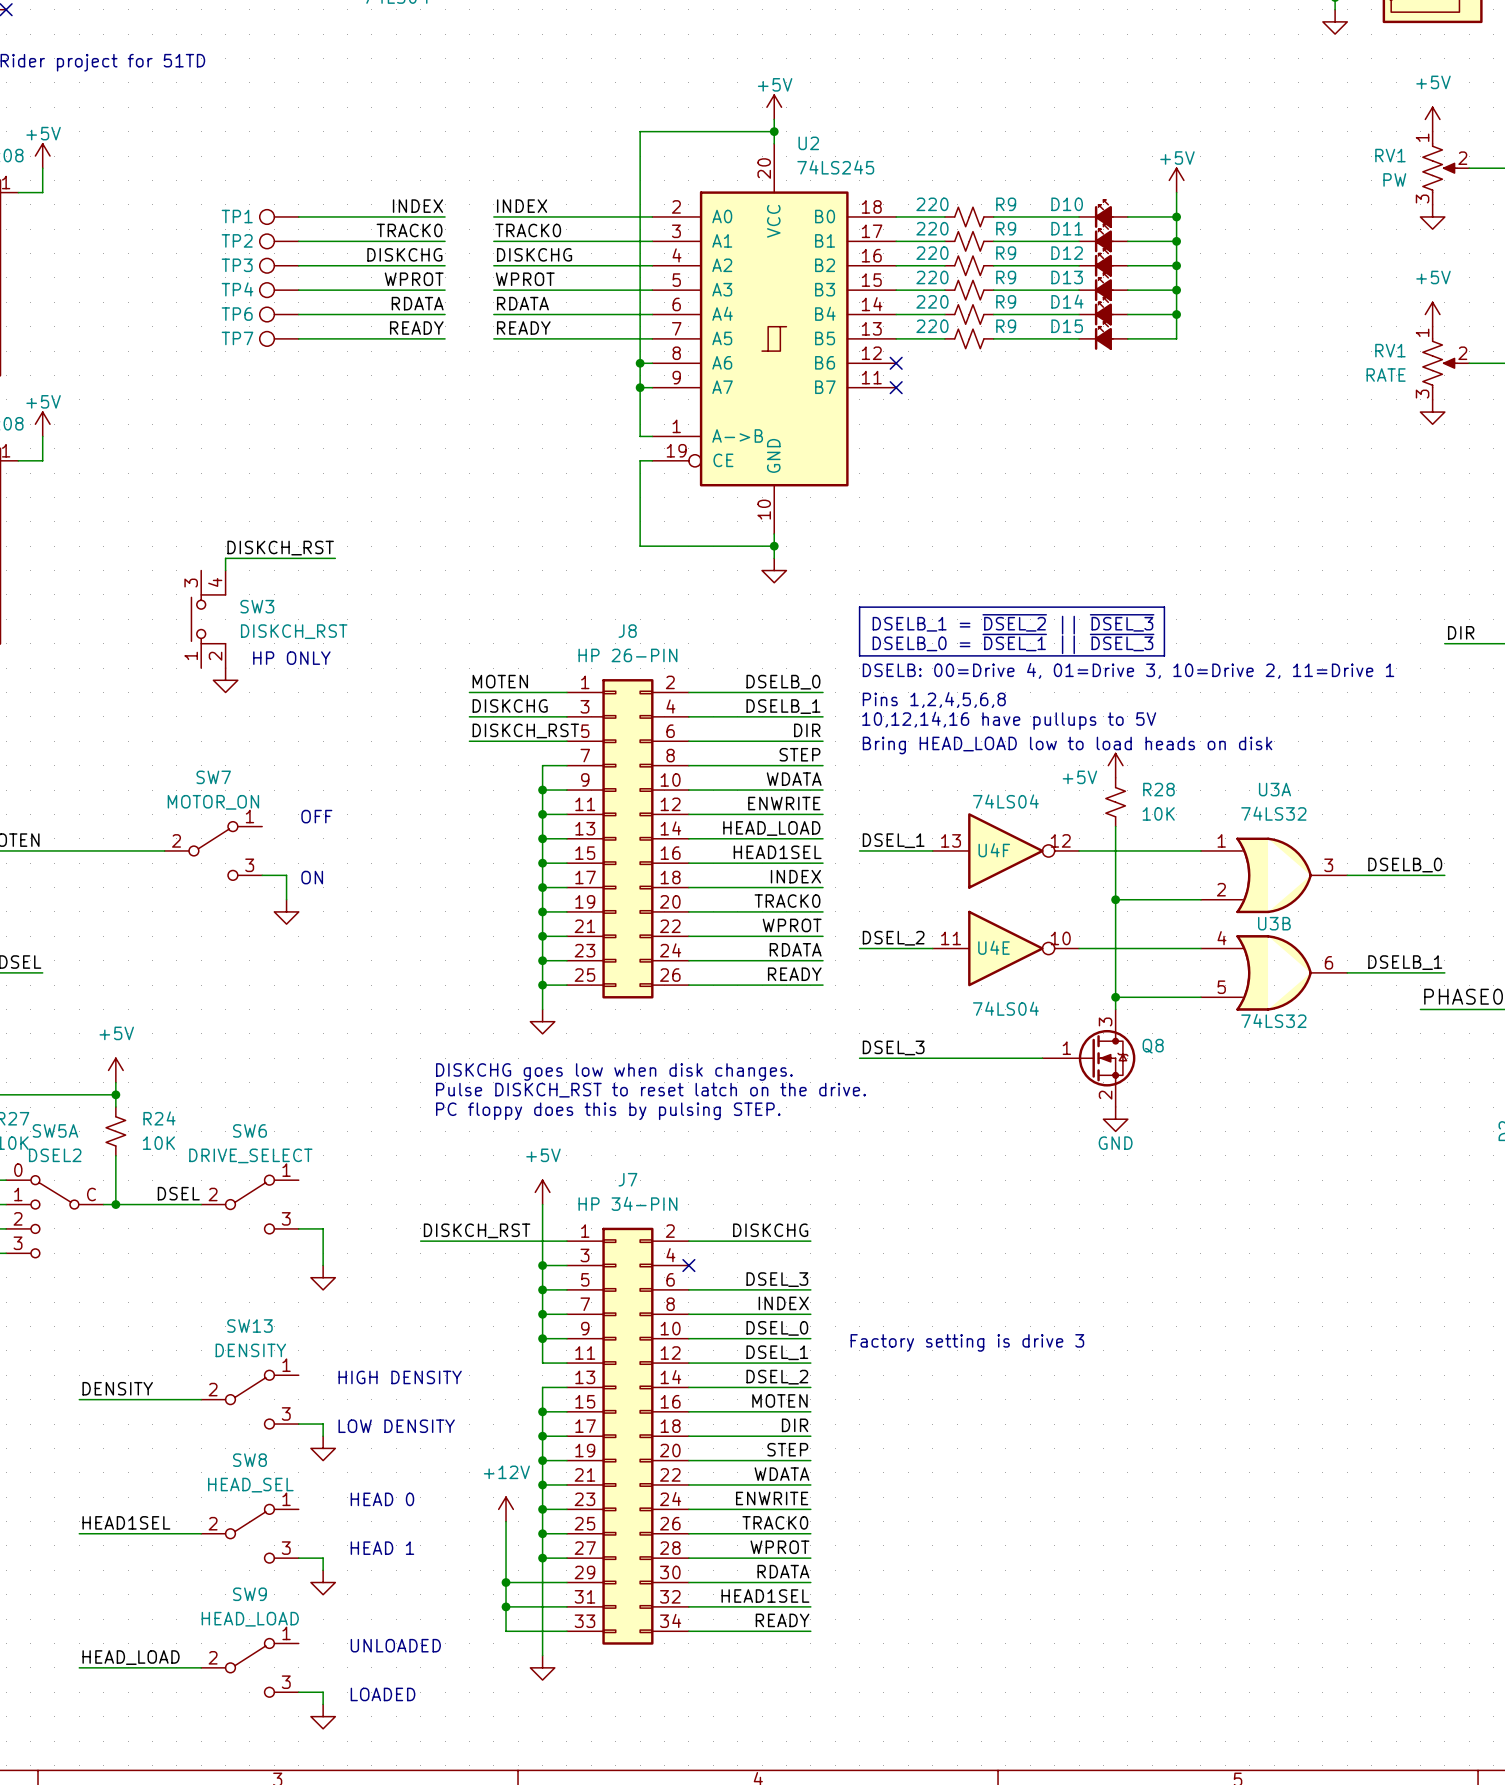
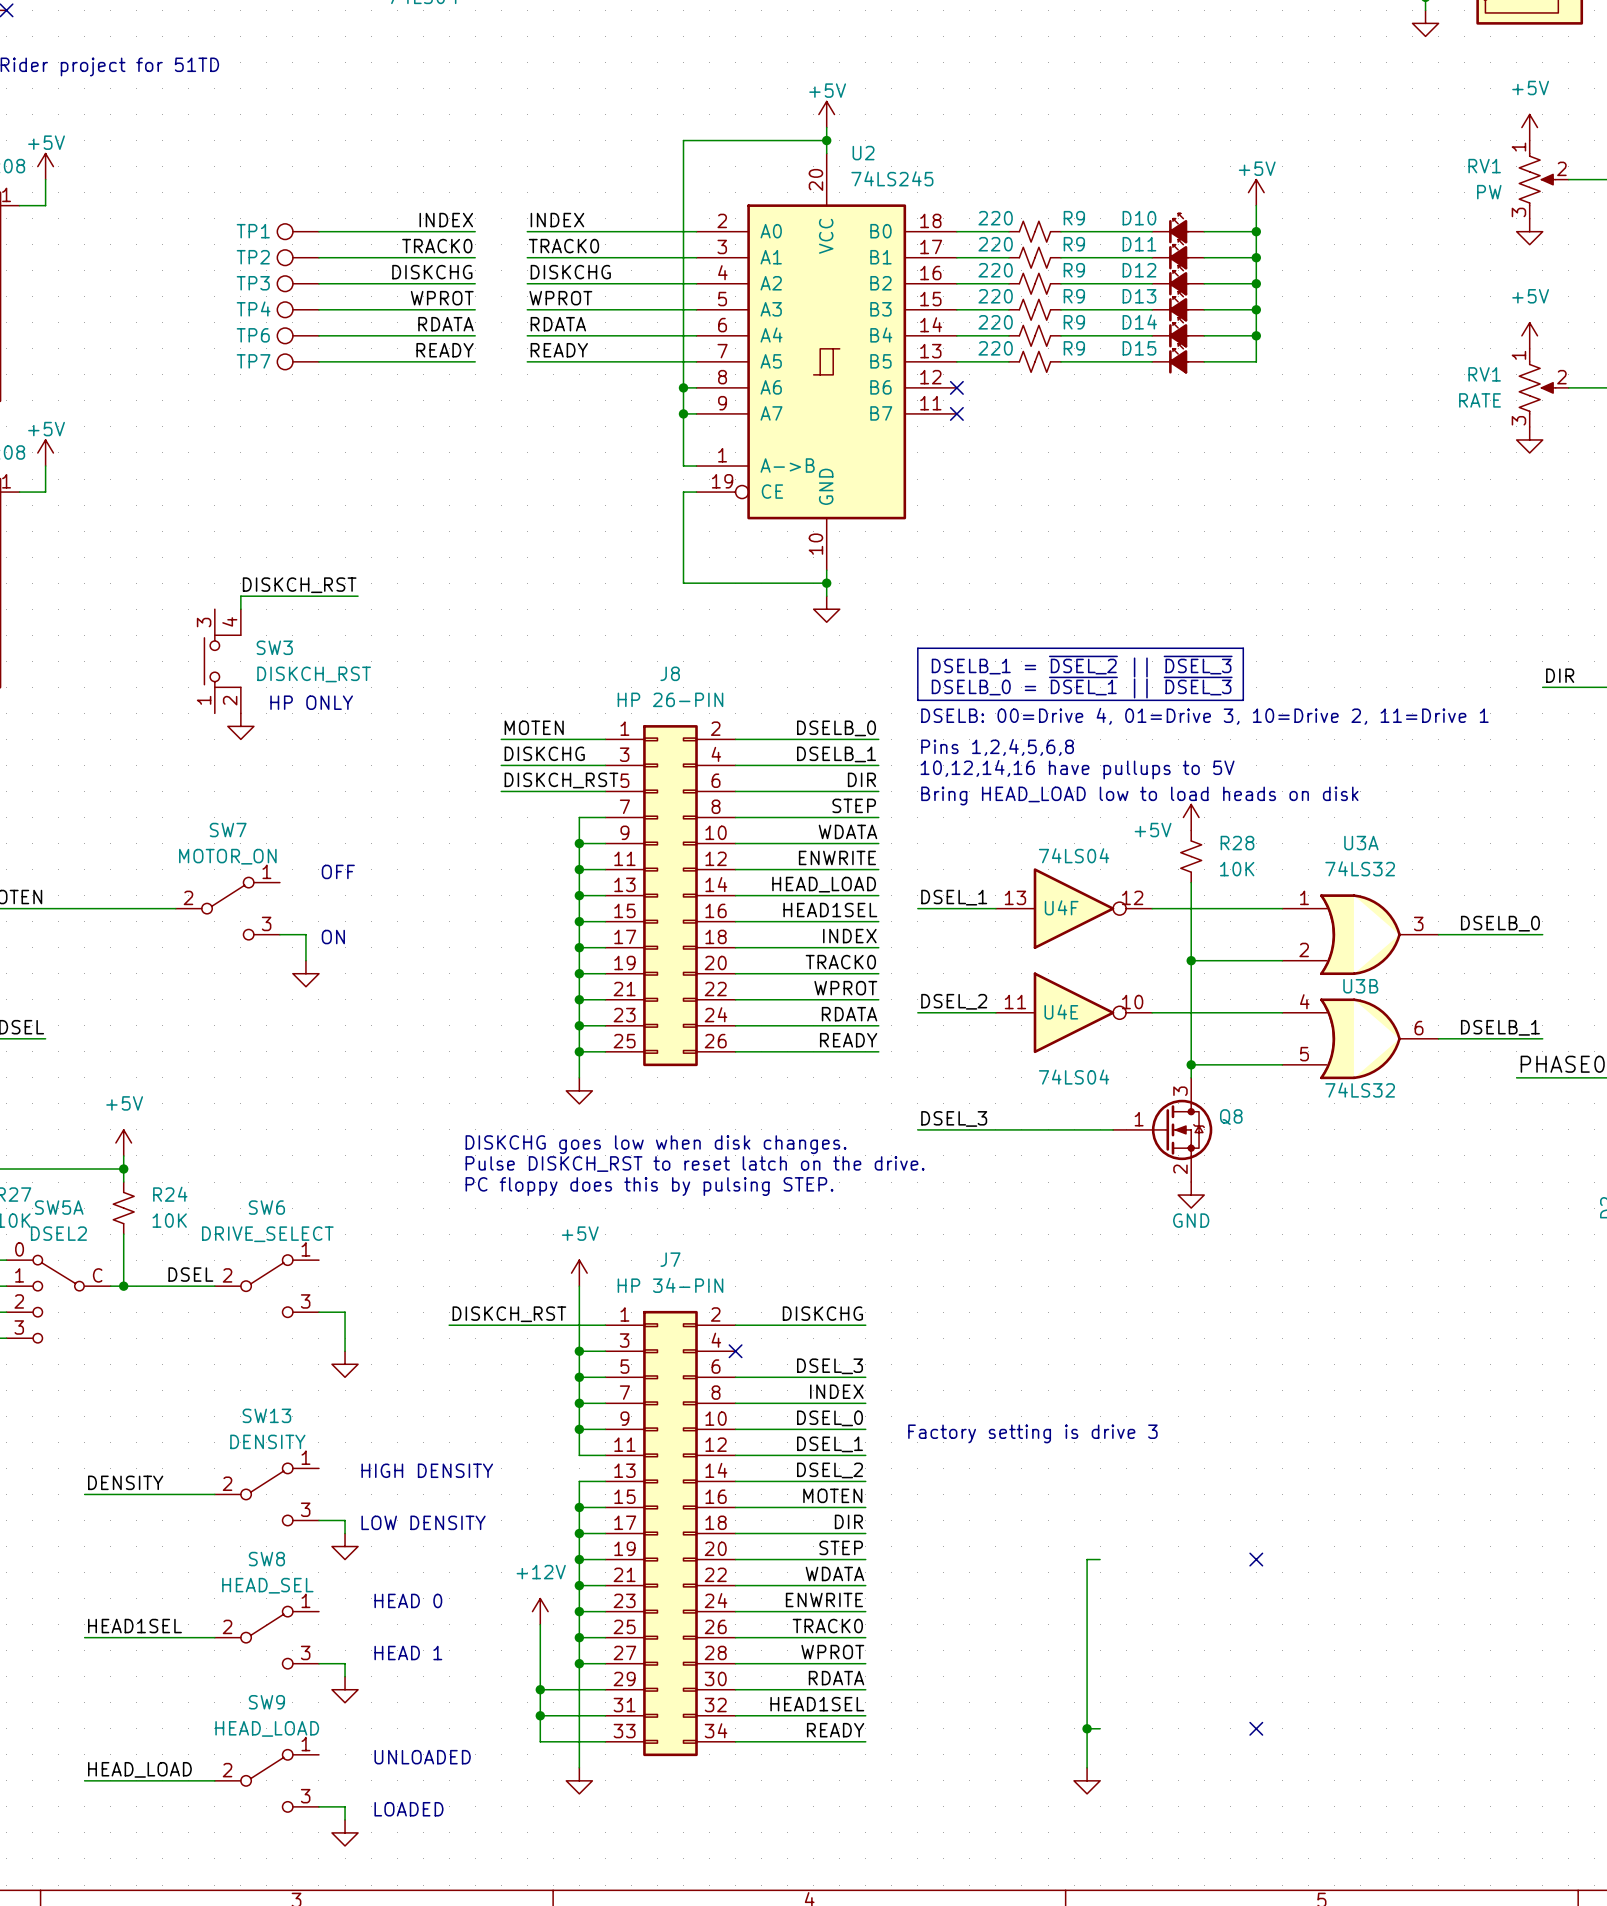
wire: none -> (1100, 1559) (1087, 1559) (1087, 1767)
no-connect mark: none -> (1256, 1559)
wire: none -> (1087, 1728) (1100, 1728)
junction: none -> (1087, 1728)
no-connect mark: none -> (1256, 1728)
power symbol: none -> (1087, 1780)

